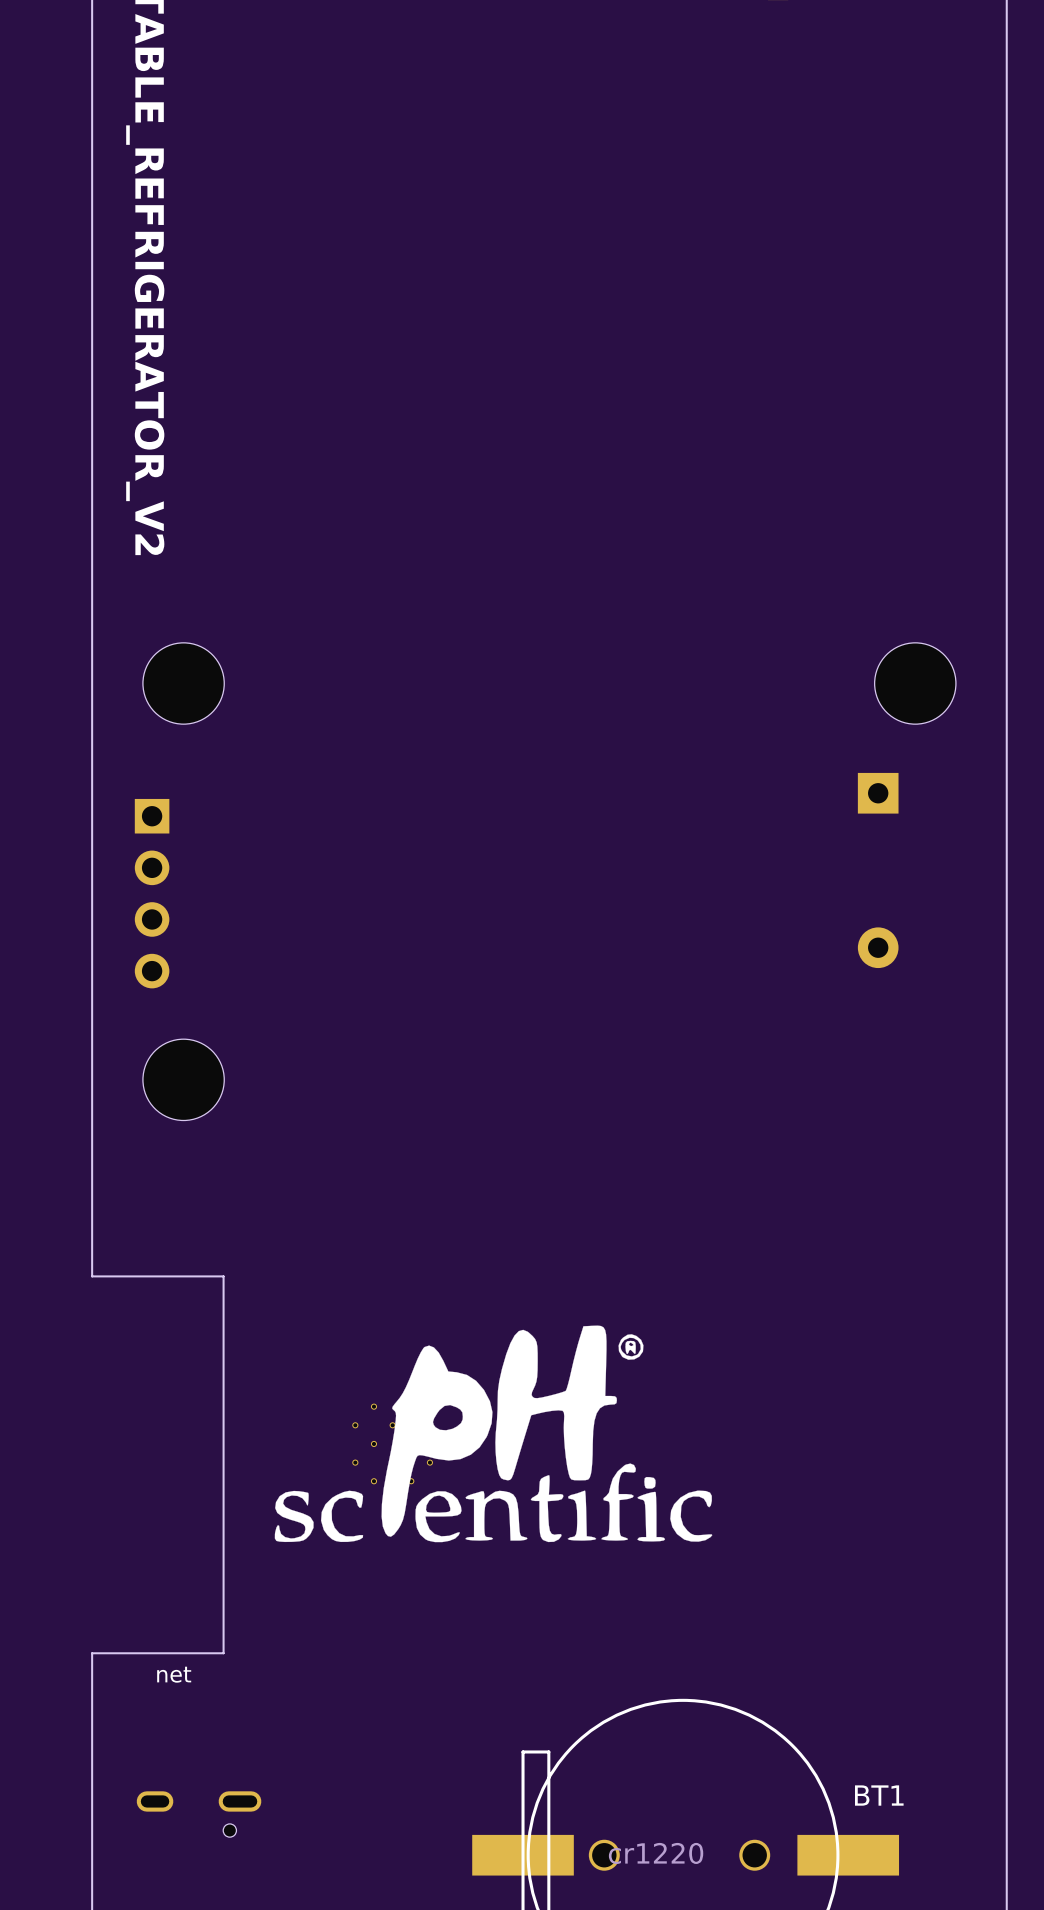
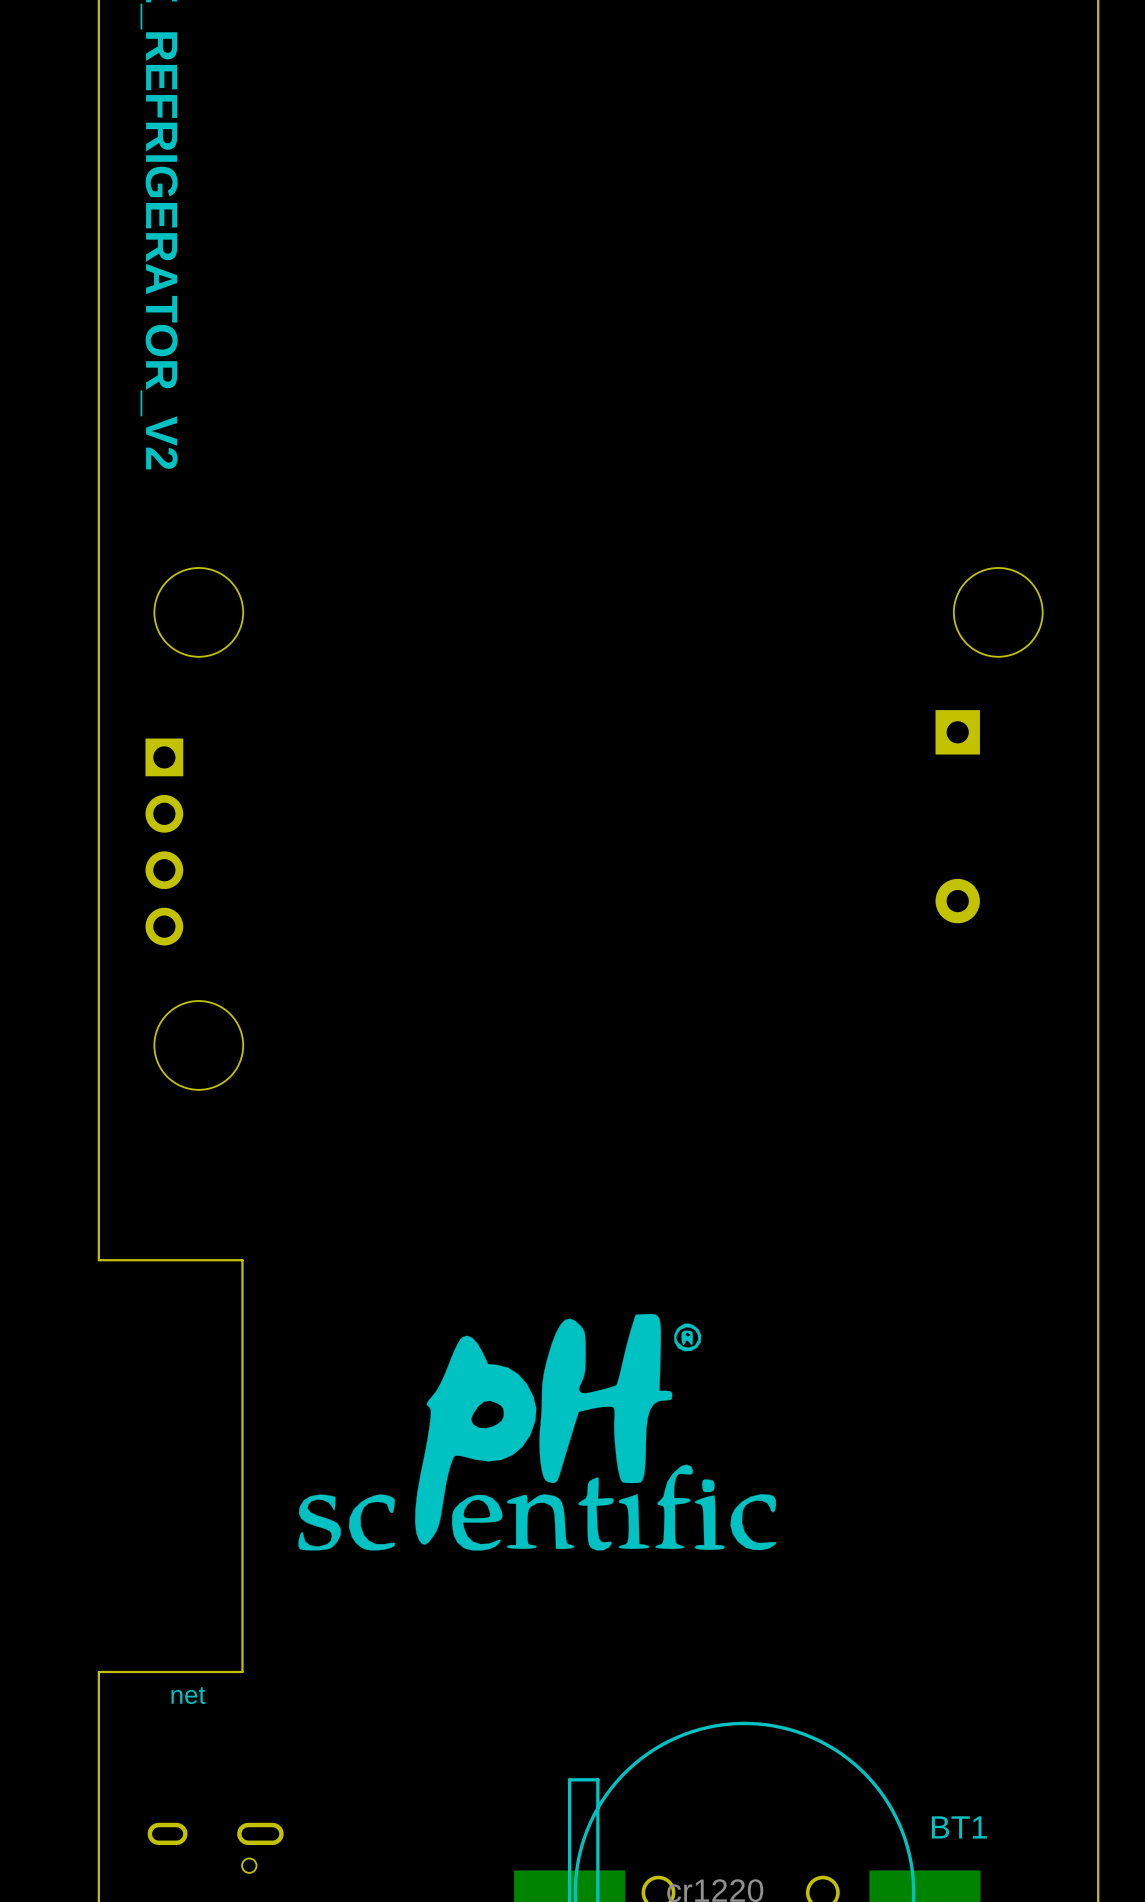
part: (392, 1443) -> none

